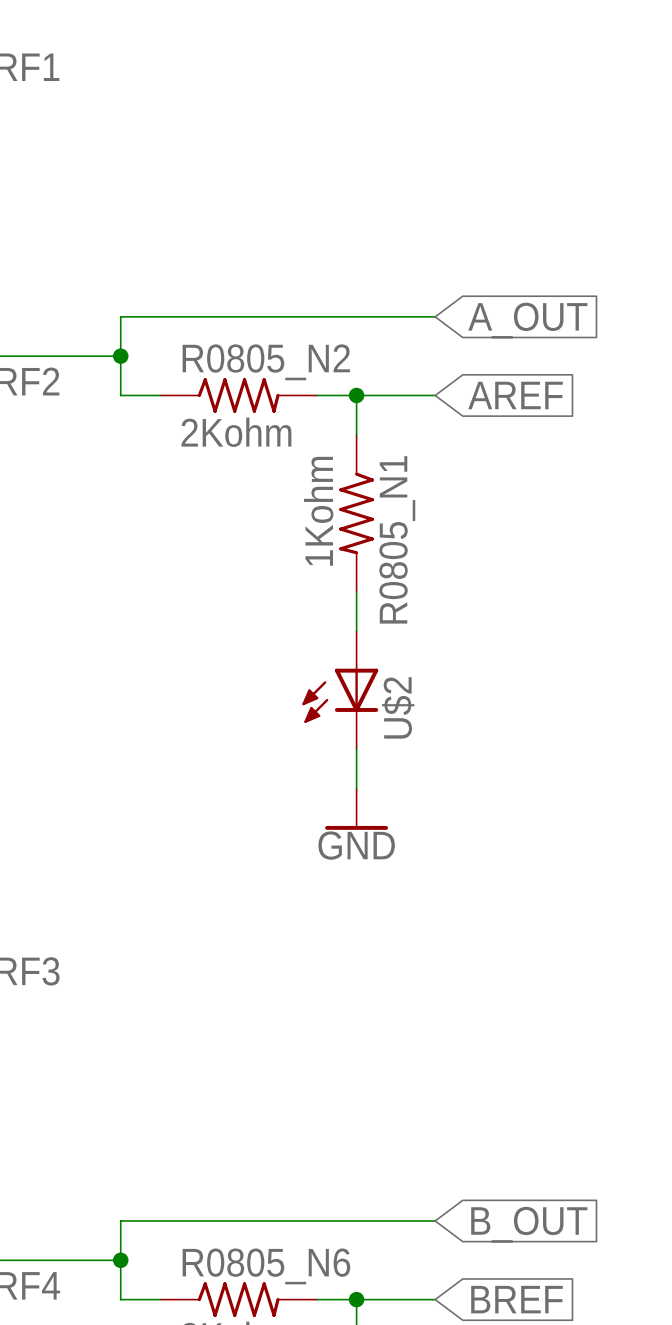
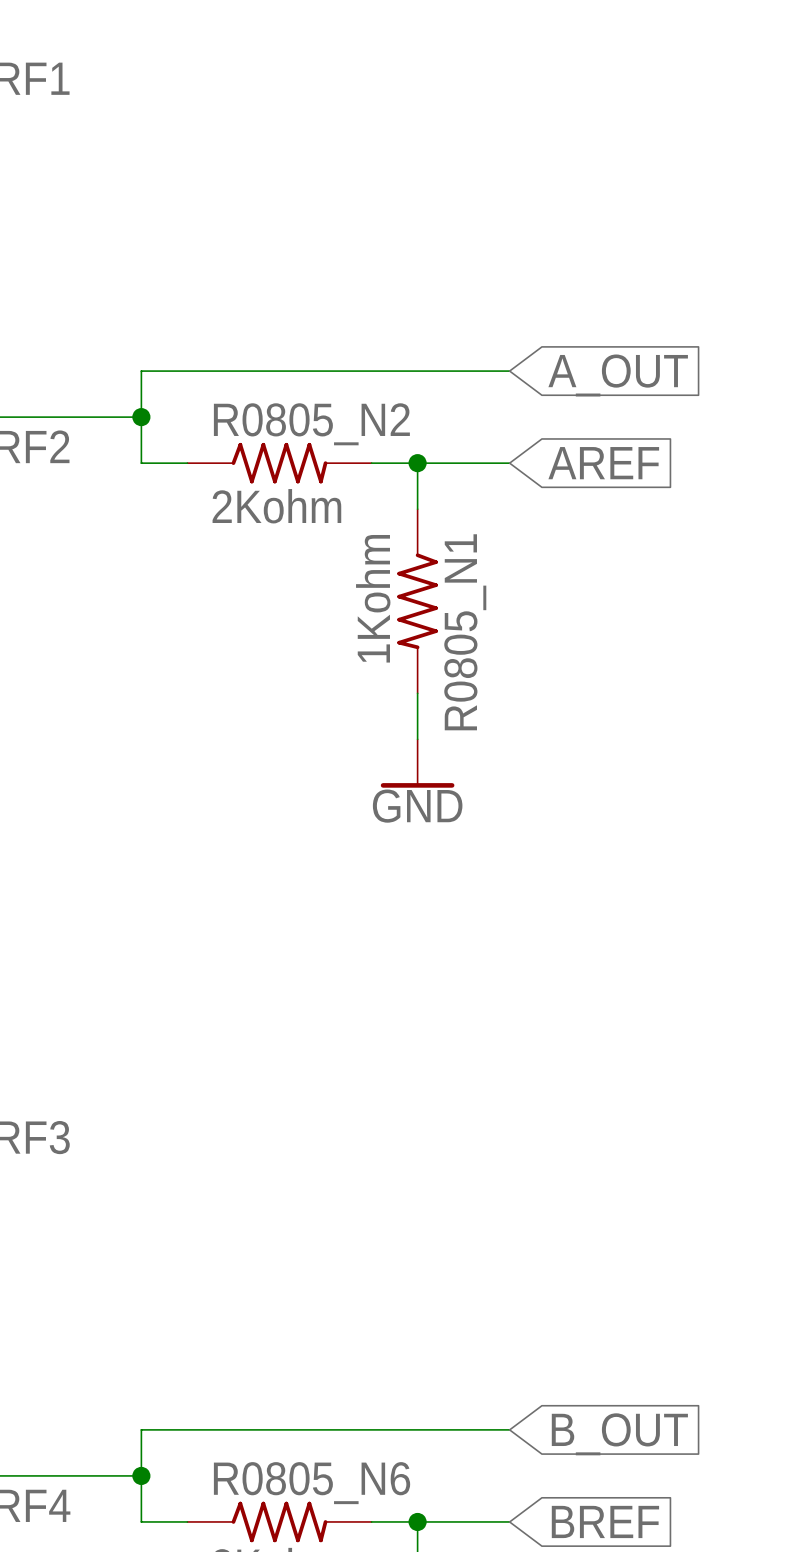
U$2: (340, 690) -> none
wire: (356, 749) (356, 788) -> none
power symbol position: GND (356, 809) -> GND (417, 763)

